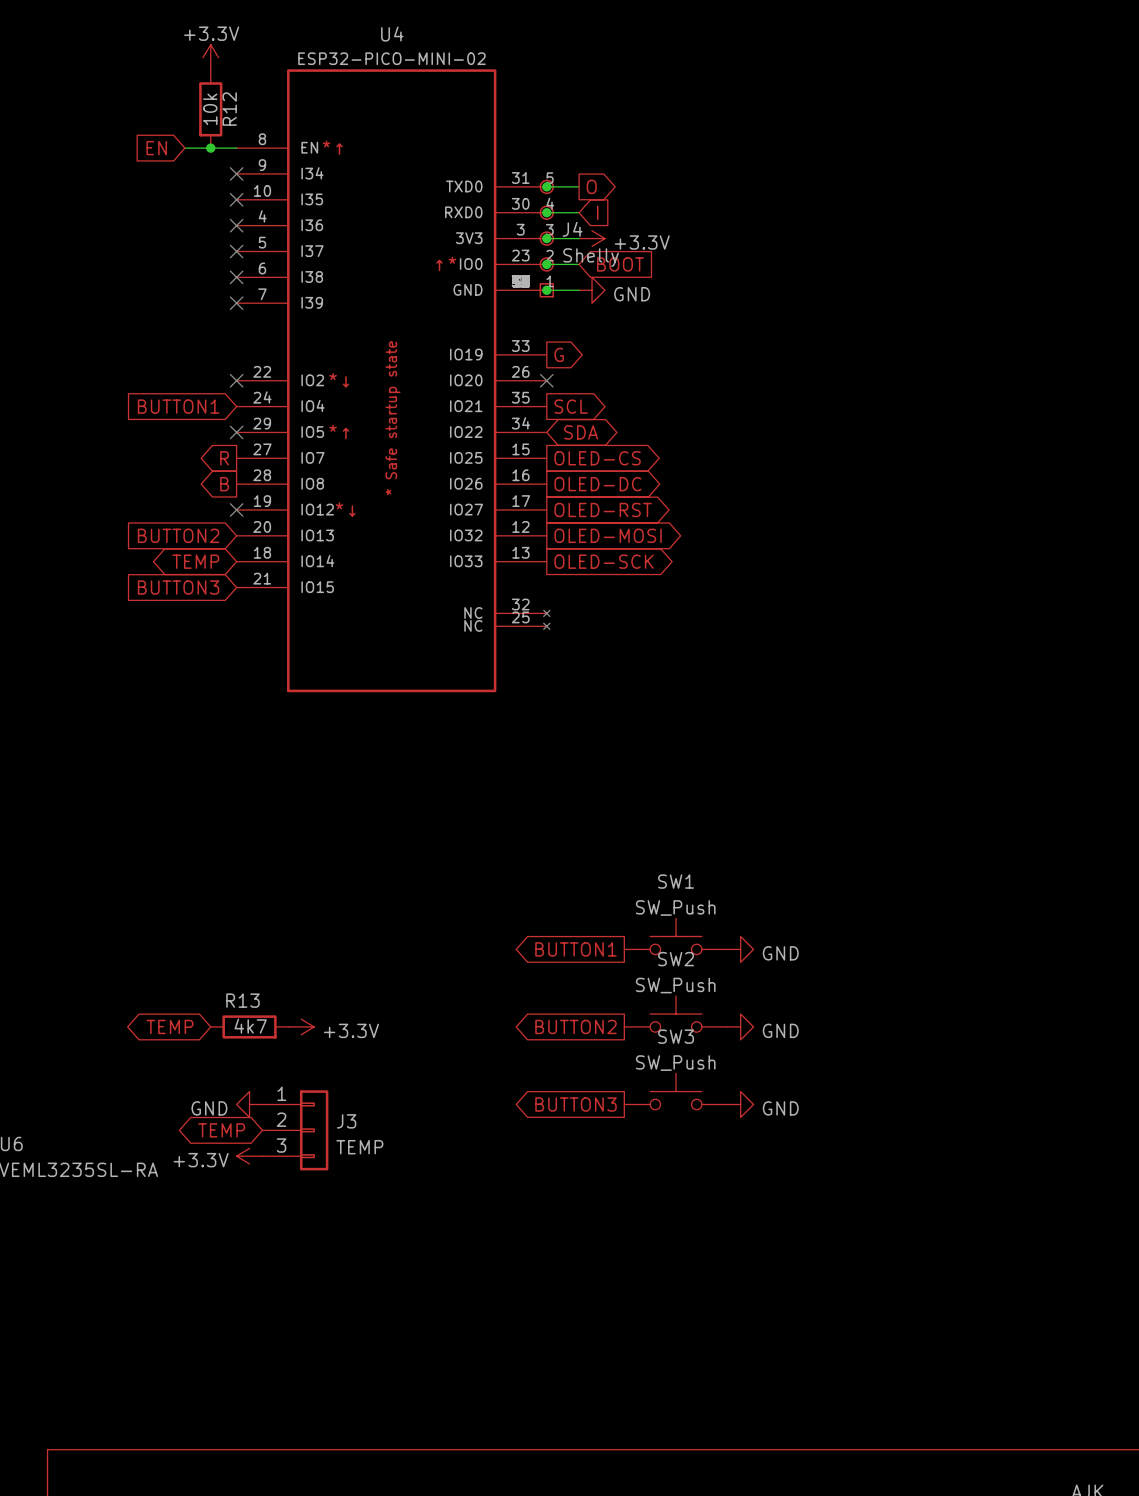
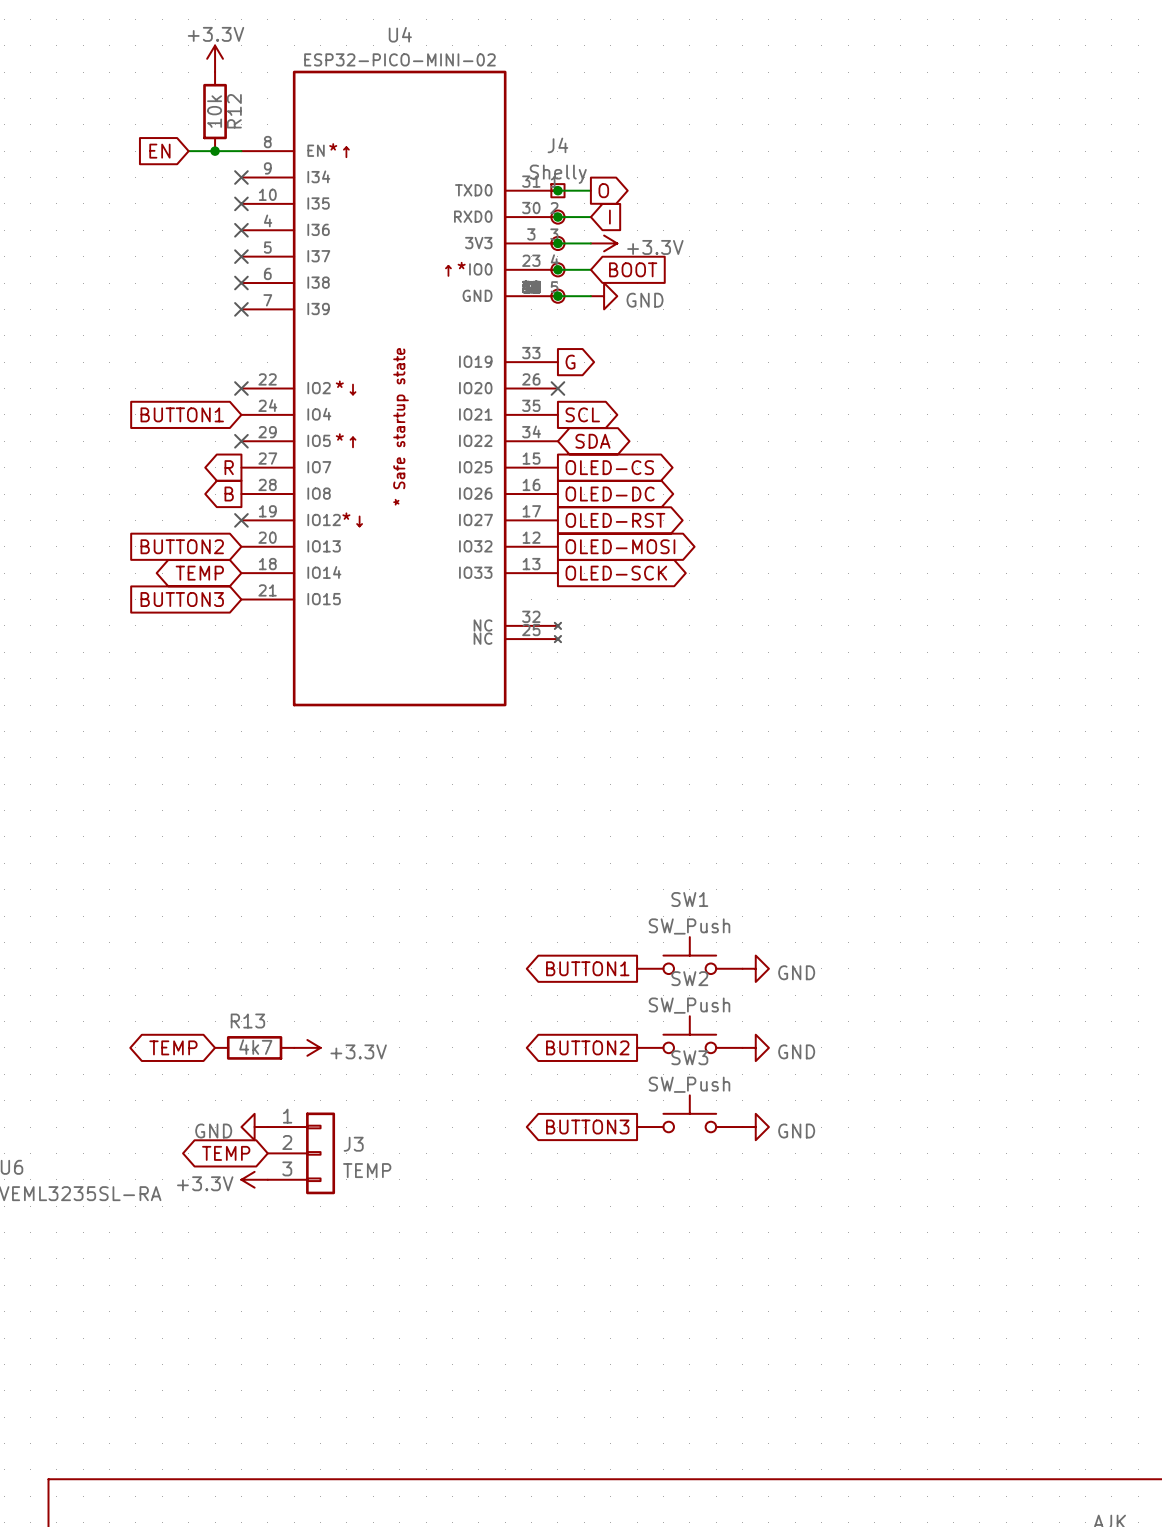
J4 name position: J4 (572, 229) -> J4 (557, 145)
J4 rotation: 0° (546, 238) -> 180° (557, 243)
J4 value position: Shelly (591, 257) -> Shelly (558, 174)

